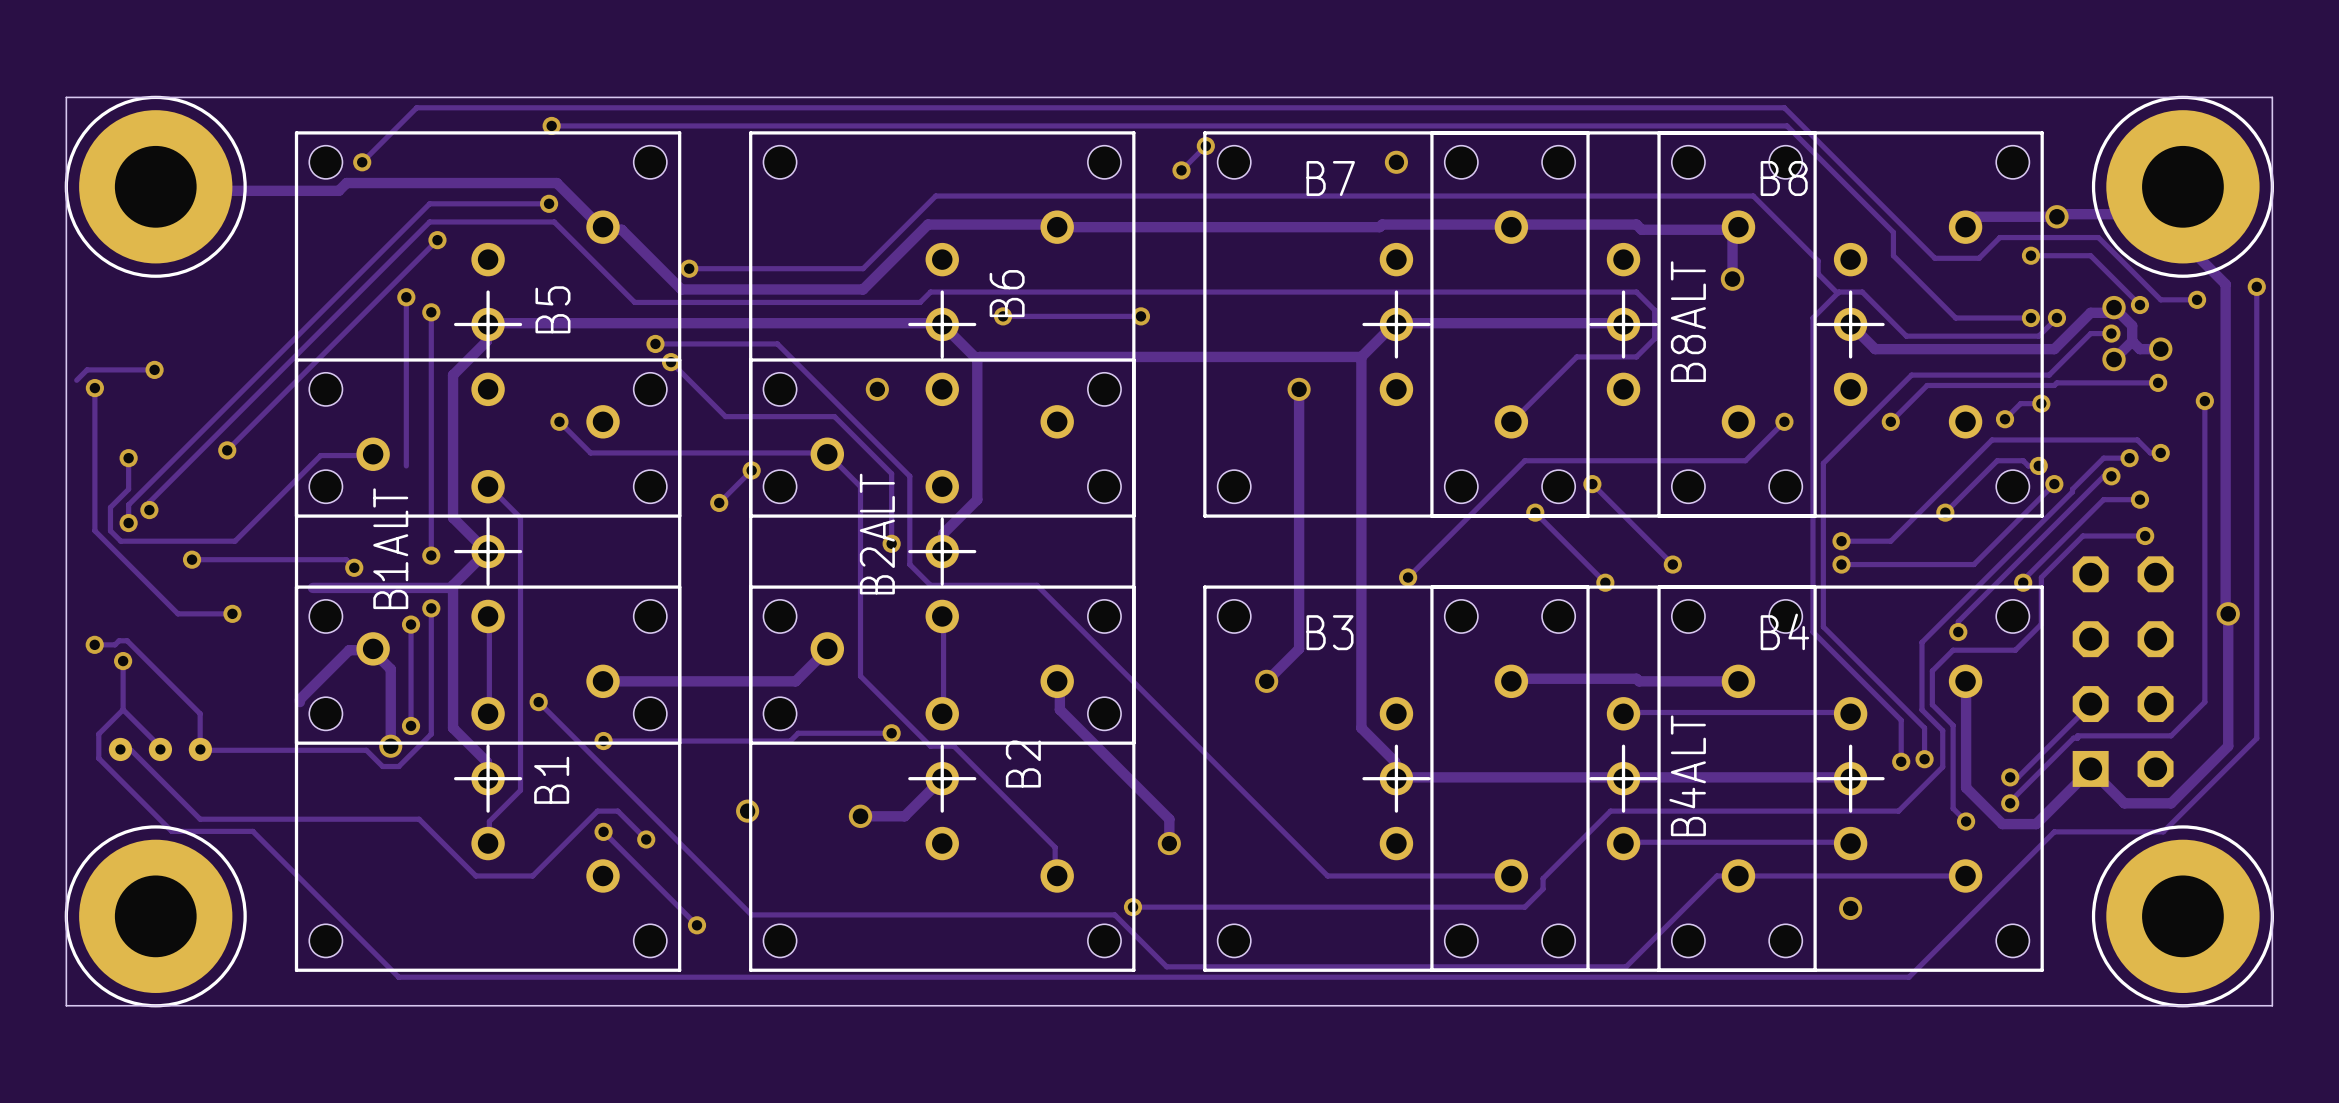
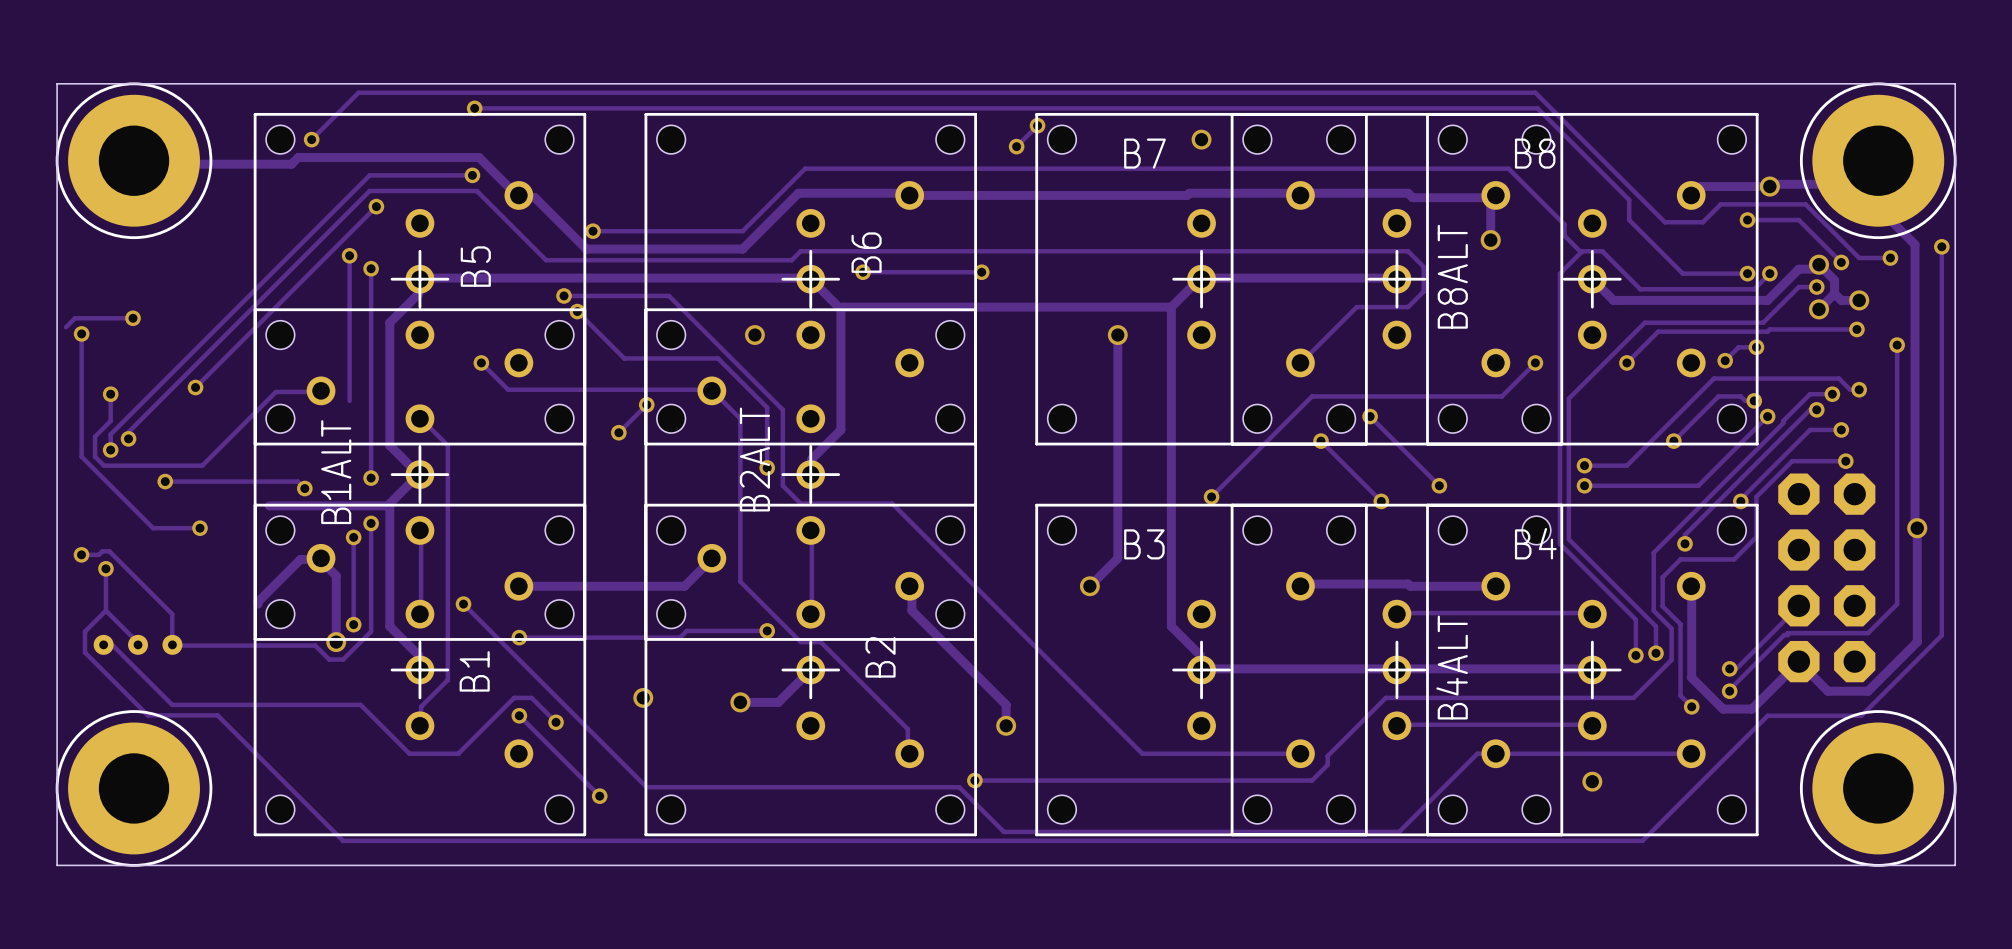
part footprint: [2072, 556, 2174, 787] -> [1778, 473, 1876, 683]

